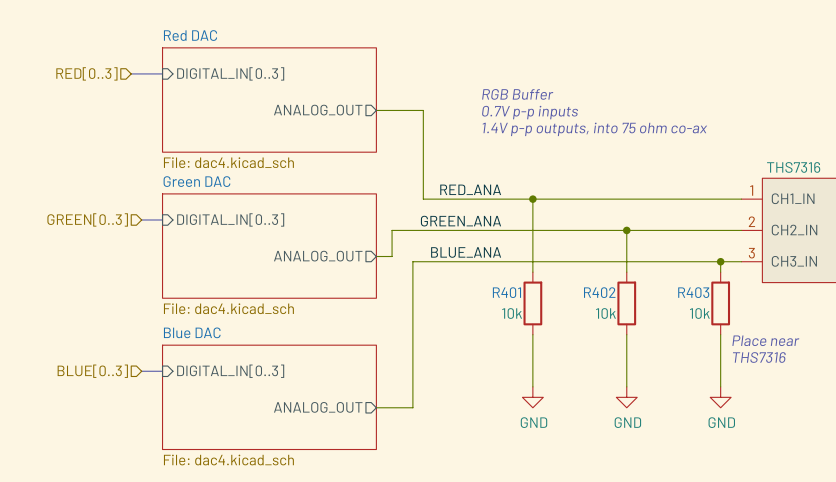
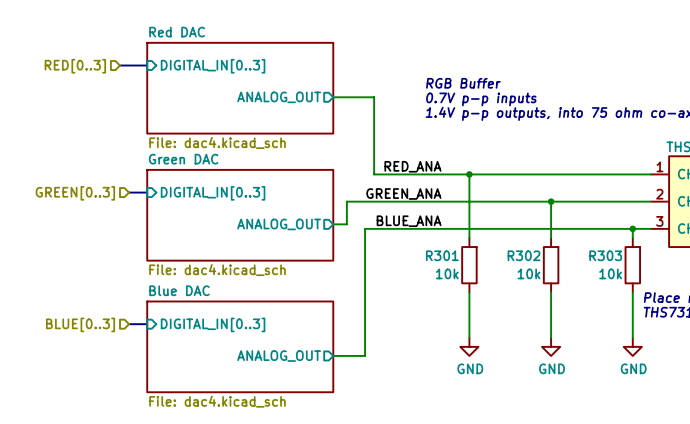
R401 name: R401 (506, 292) -> R301 (442, 255)
R402 name: R402 (599, 292) -> R302 (524, 255)
R403 name: R403 (693, 292) -> R303 (605, 255)

